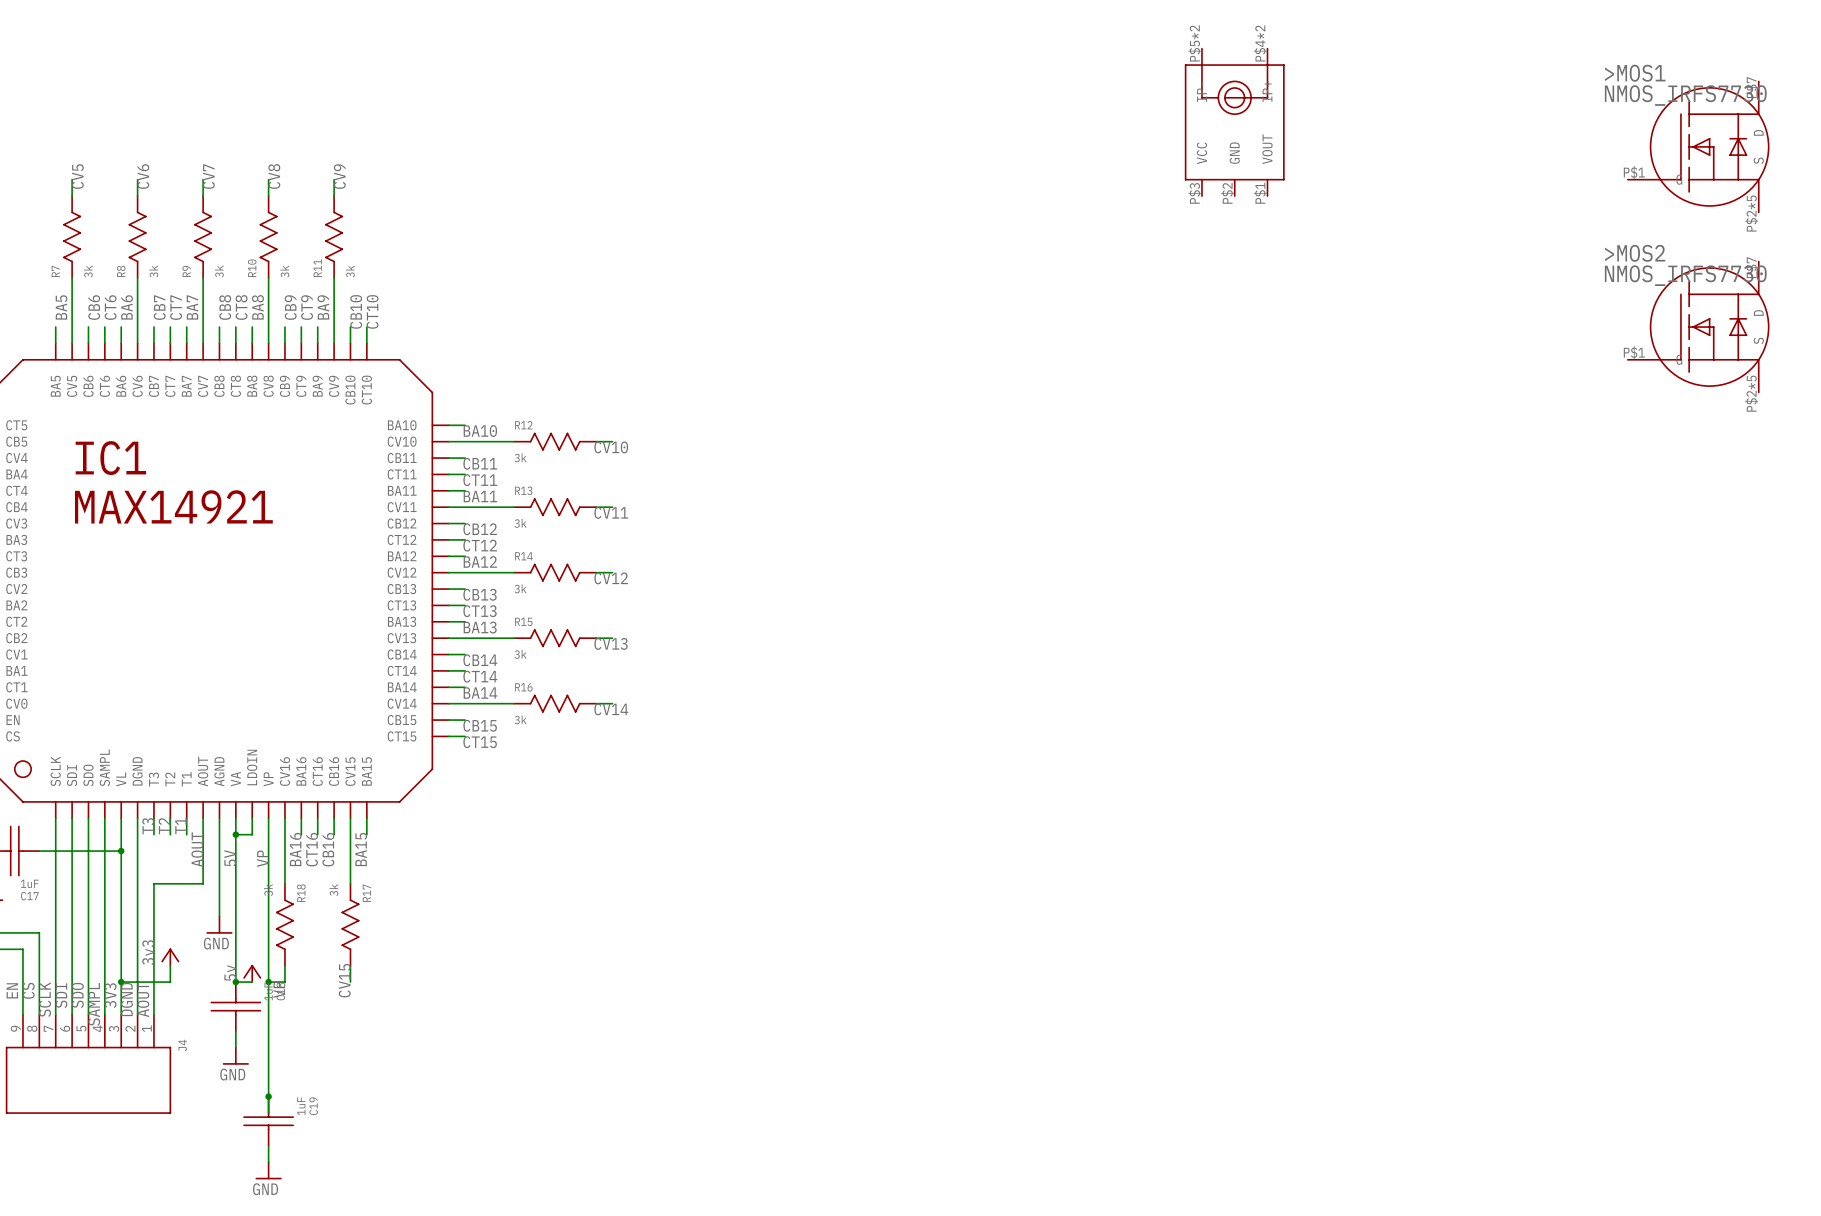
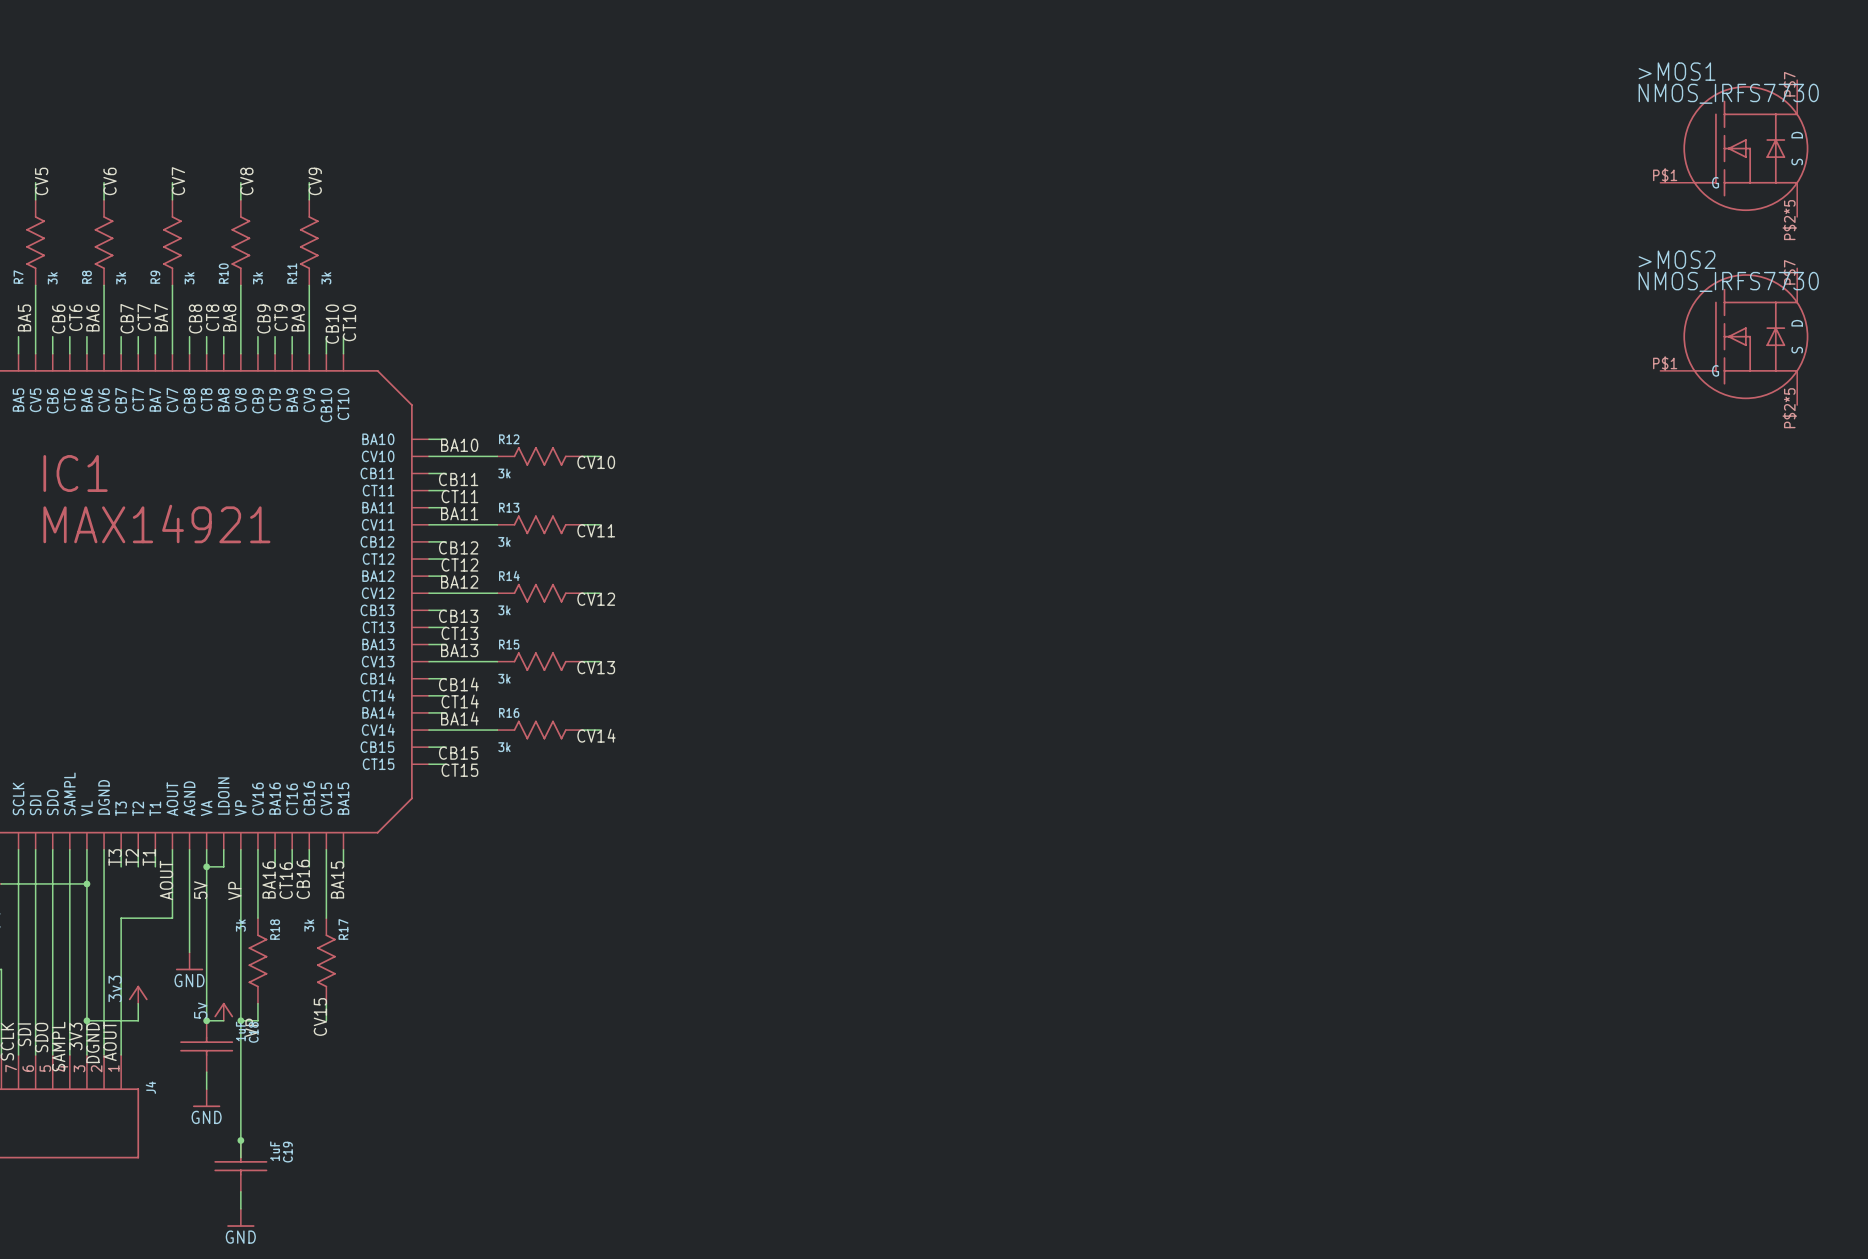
part: (1234, 122) -> none

